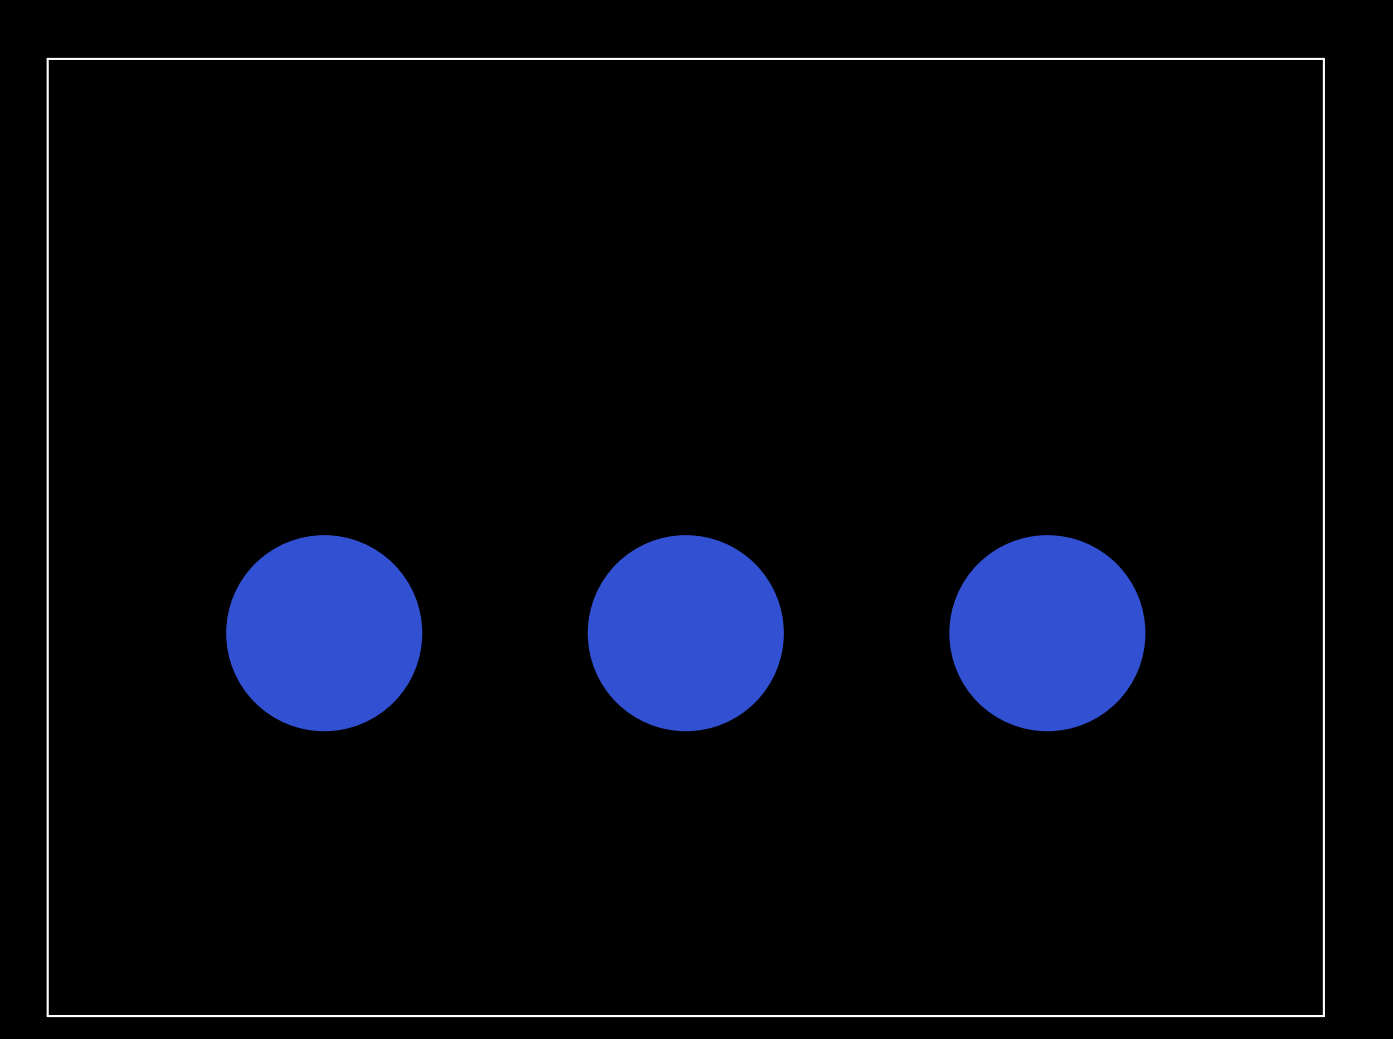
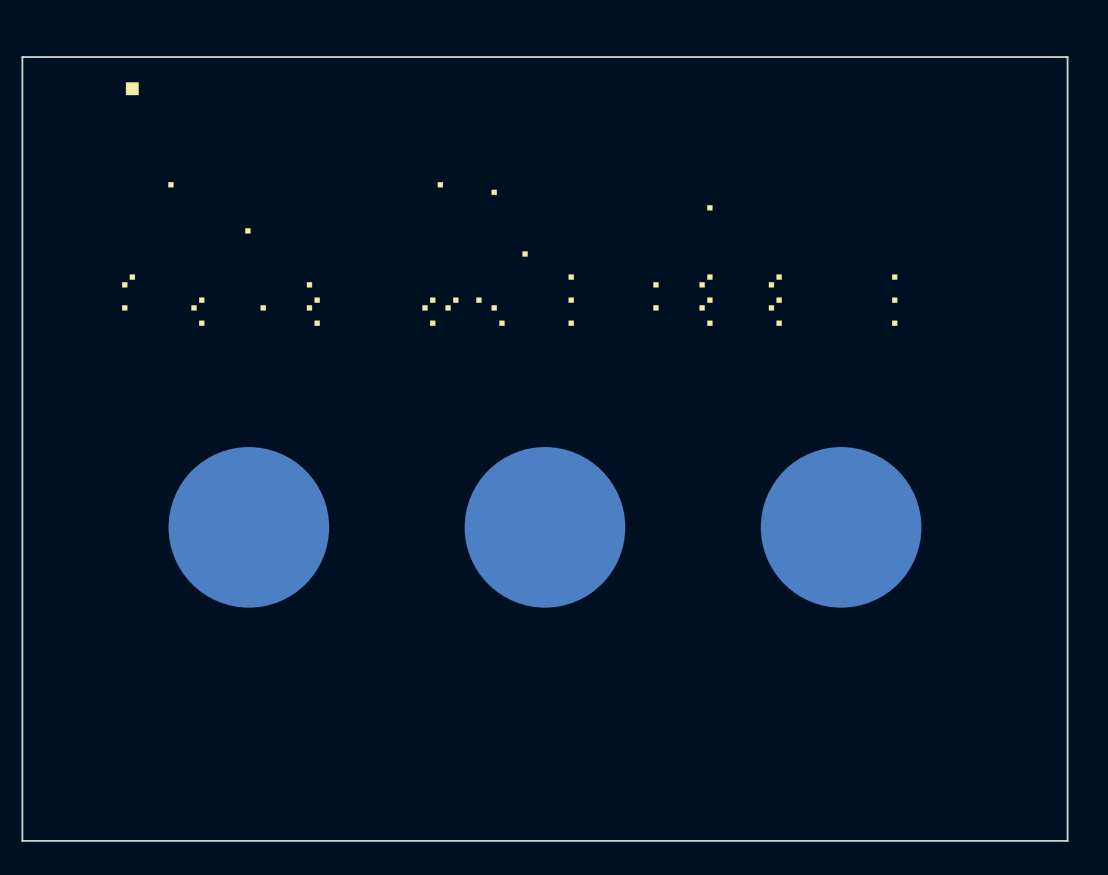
drawing: none -> [125, 82, 139, 96]
drawing: none -> [168, 182, 174, 188]
drawing: none -> [437, 182, 444, 188]
drawing: none -> [491, 189, 497, 196]
drawing: none -> [707, 205, 713, 211]
drawing: none -> [245, 228, 251, 234]
drawing: none -> [522, 251, 528, 257]
drawing: none -> [122, 274, 136, 311]
drawing: none -> [568, 274, 574, 326]
drawing: none -> [699, 274, 713, 326]
drawing: none -> [768, 274, 782, 326]
drawing: none -> [892, 274, 898, 326]
drawing: none -> [306, 282, 320, 326]
drawing: none -> [653, 282, 659, 311]
drawing: none -> [191, 297, 205, 326]
drawing: none -> [422, 297, 505, 326]
drawing: none -> [260, 305, 266, 311]

